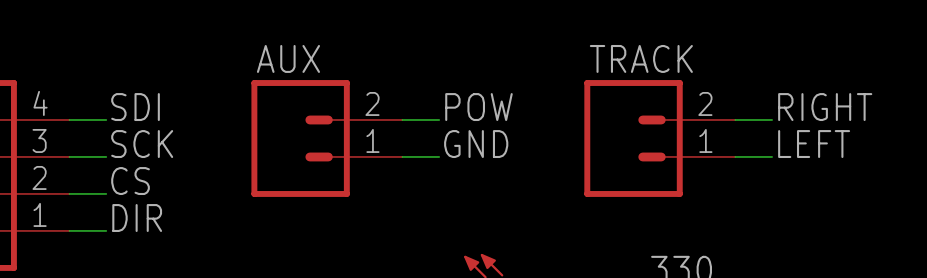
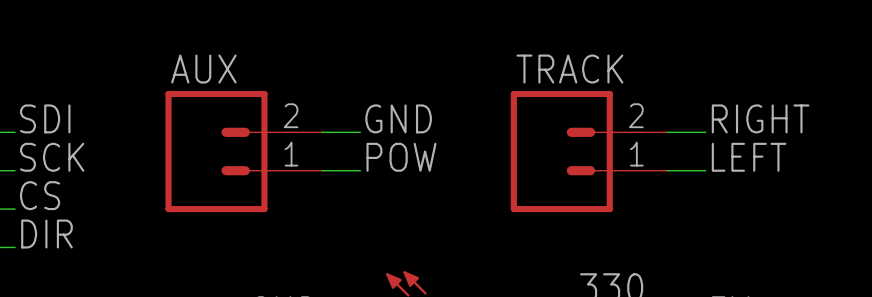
label: POW (478, 107) -> GND (398, 118)
label: GND (476, 144) -> POW (401, 157)

